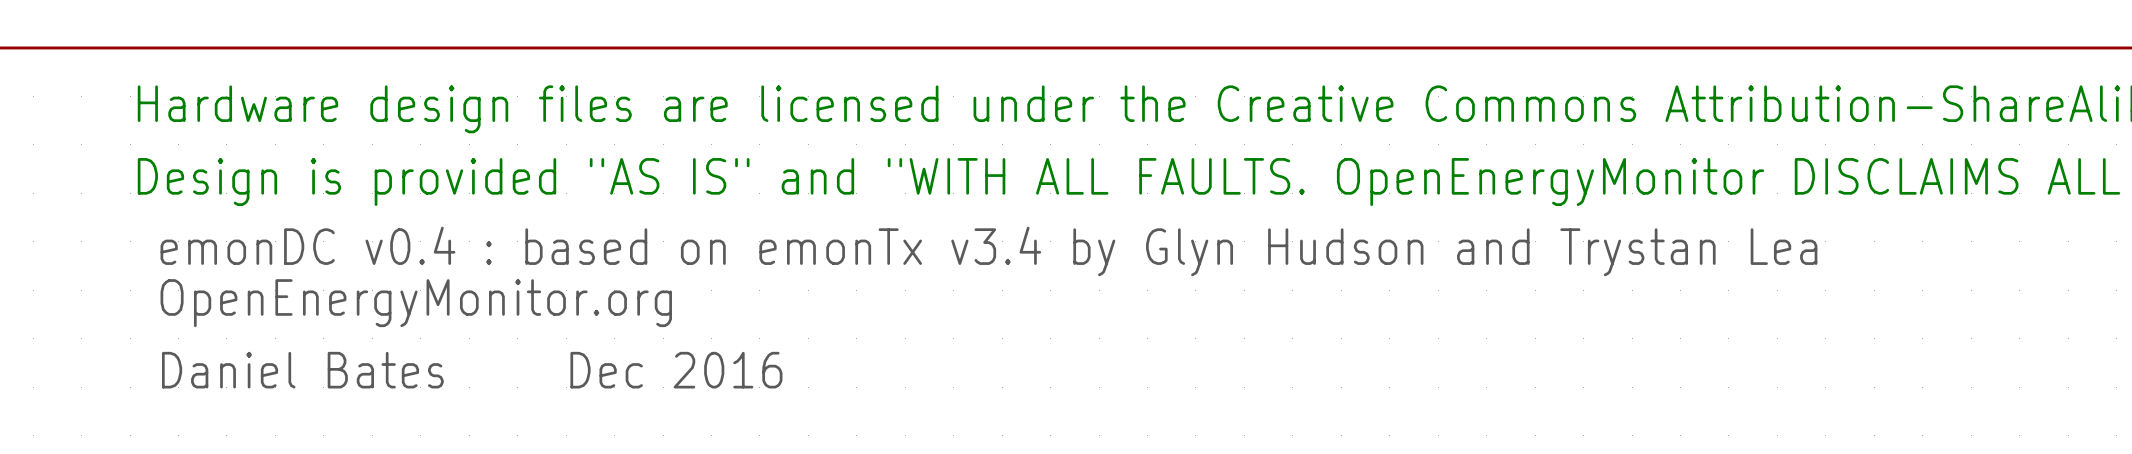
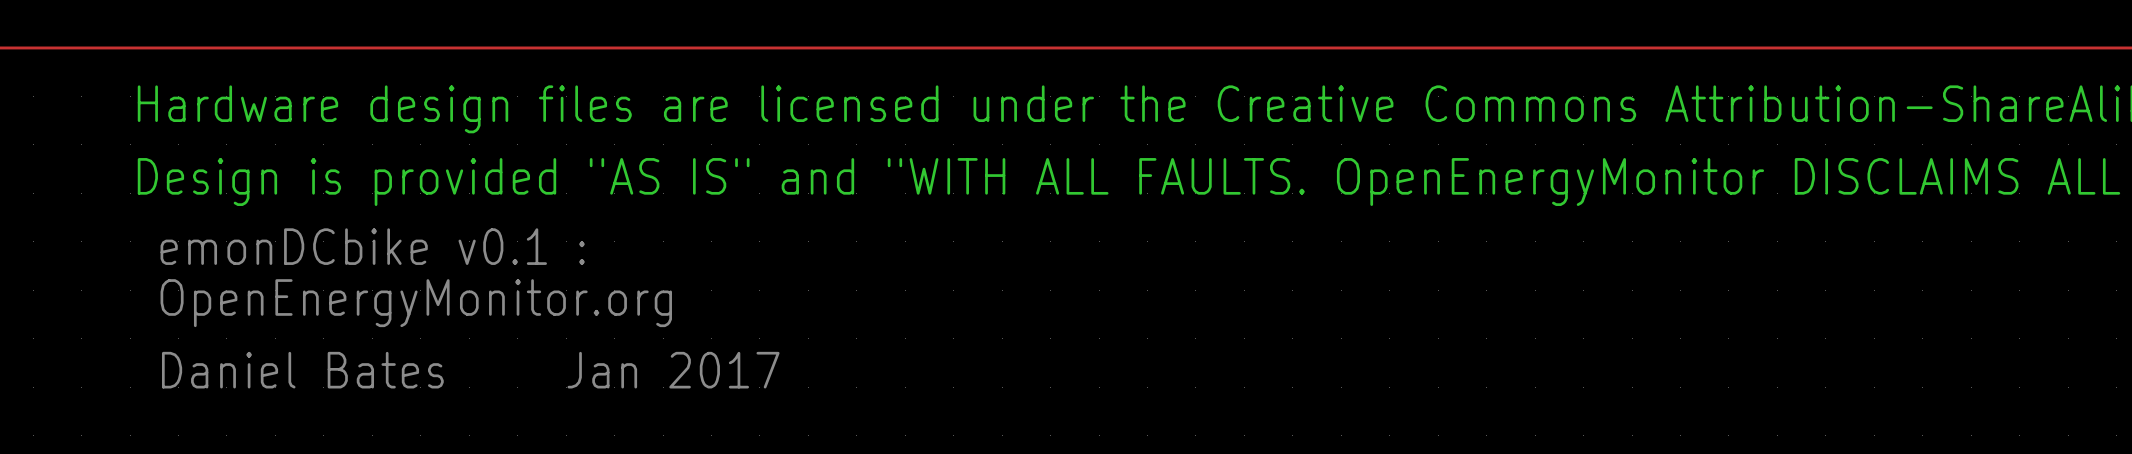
text: emonDC v0.4 : based on emonTx v3.4 by Glyn Hudson and Trystan Lea (988, 251) -> emonDCbike v0.1 : (372, 246)
text: Daniel Bates Dec 2016 (472, 370) -> Daniel Bates Jan 2017 (470, 370)

